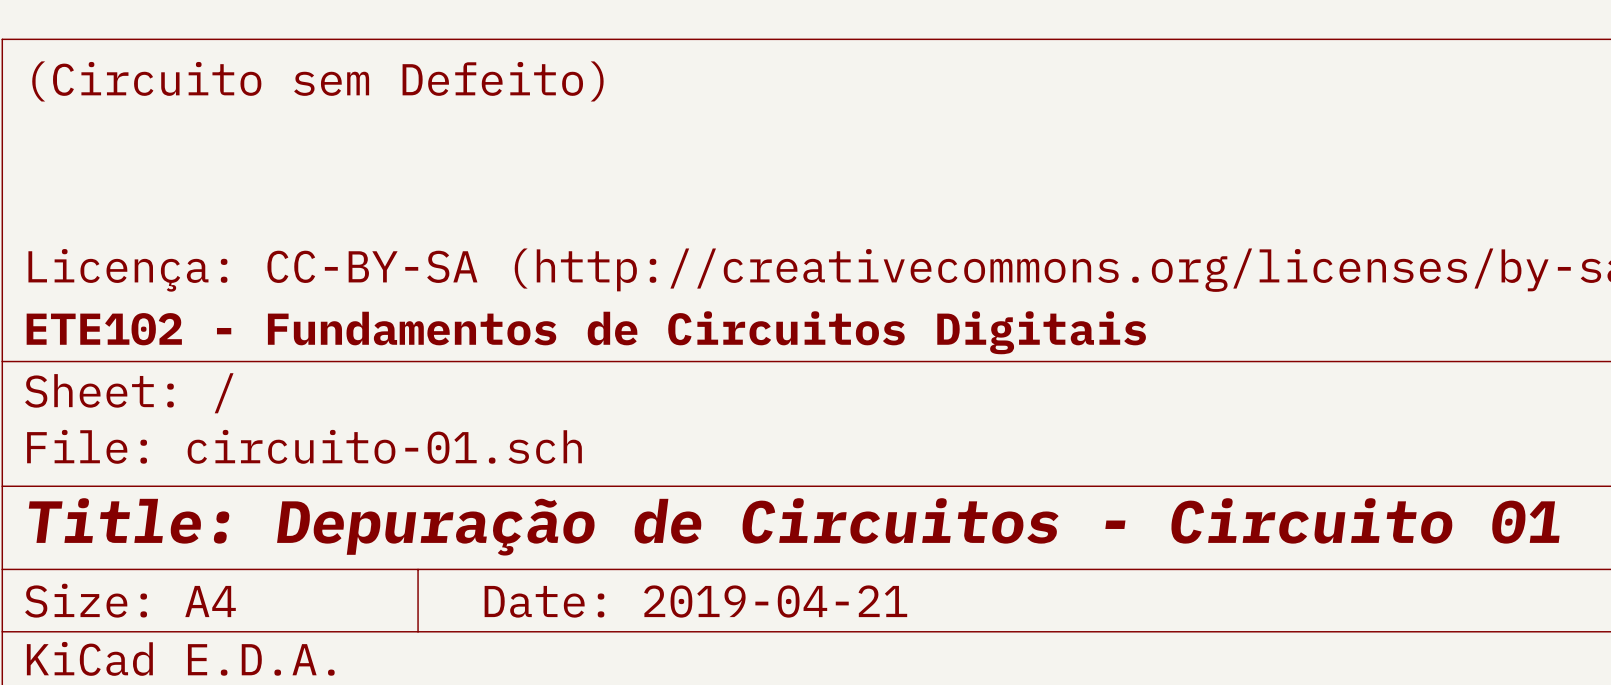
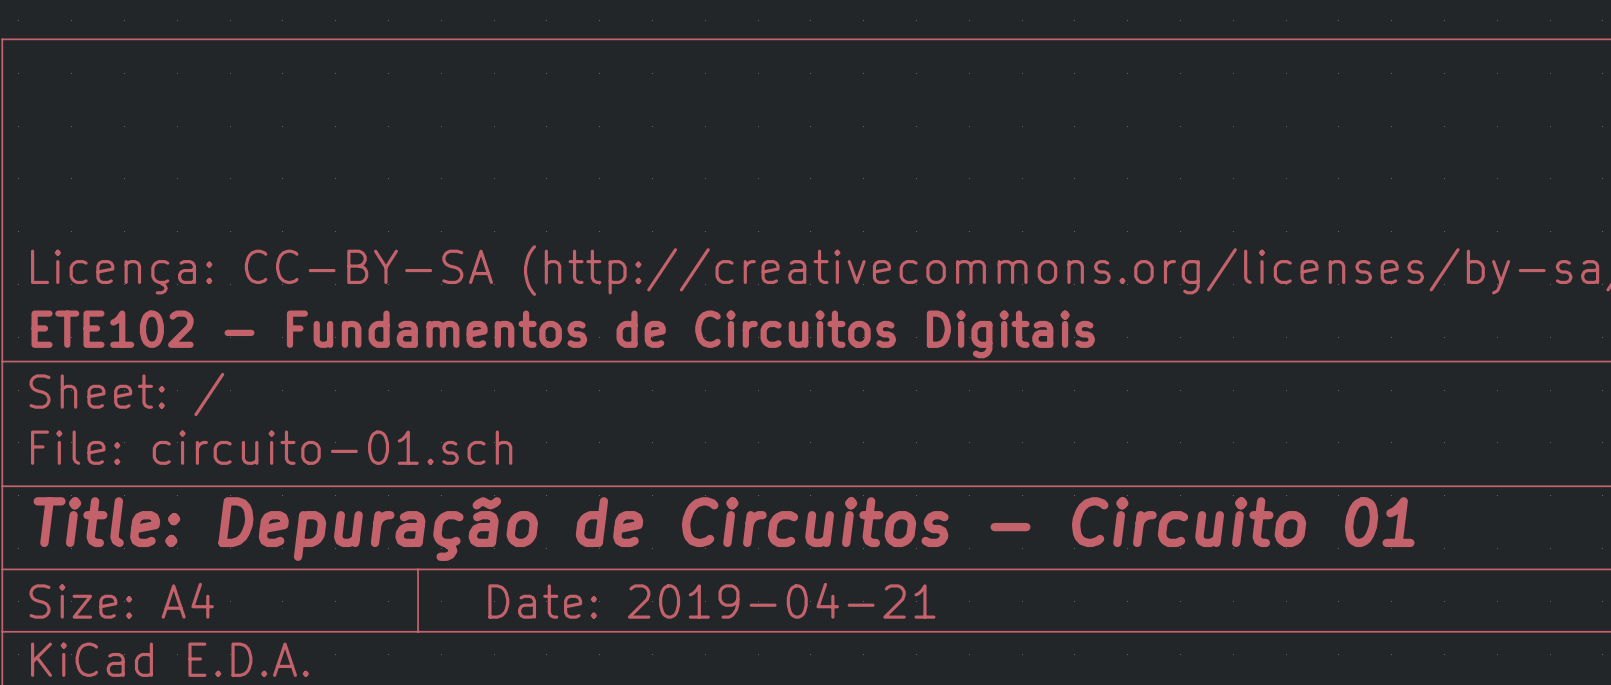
title block: (Circuito sem Defeito) (317, 81) -> none

